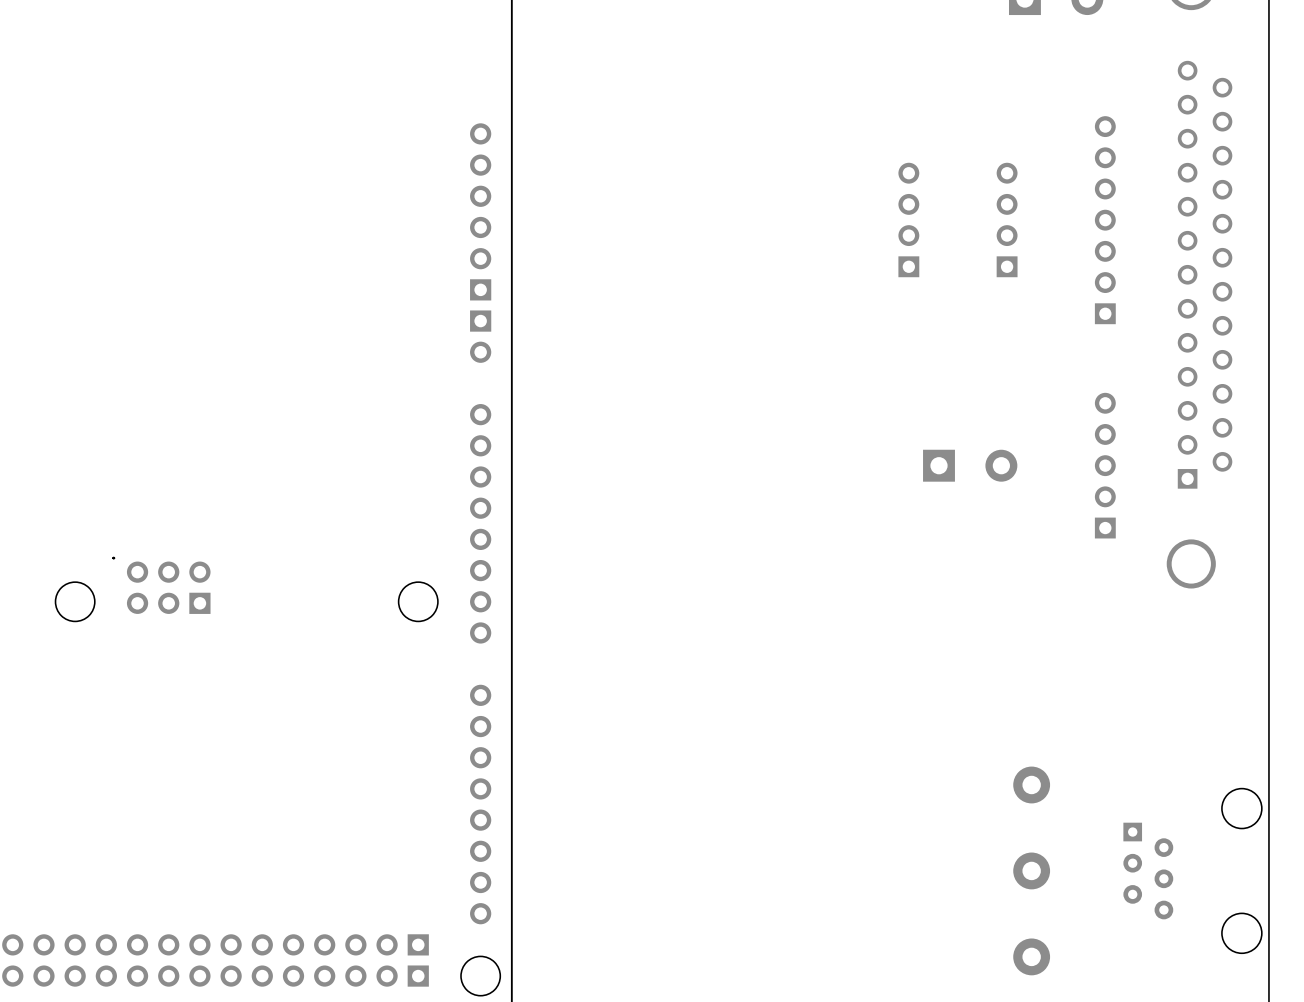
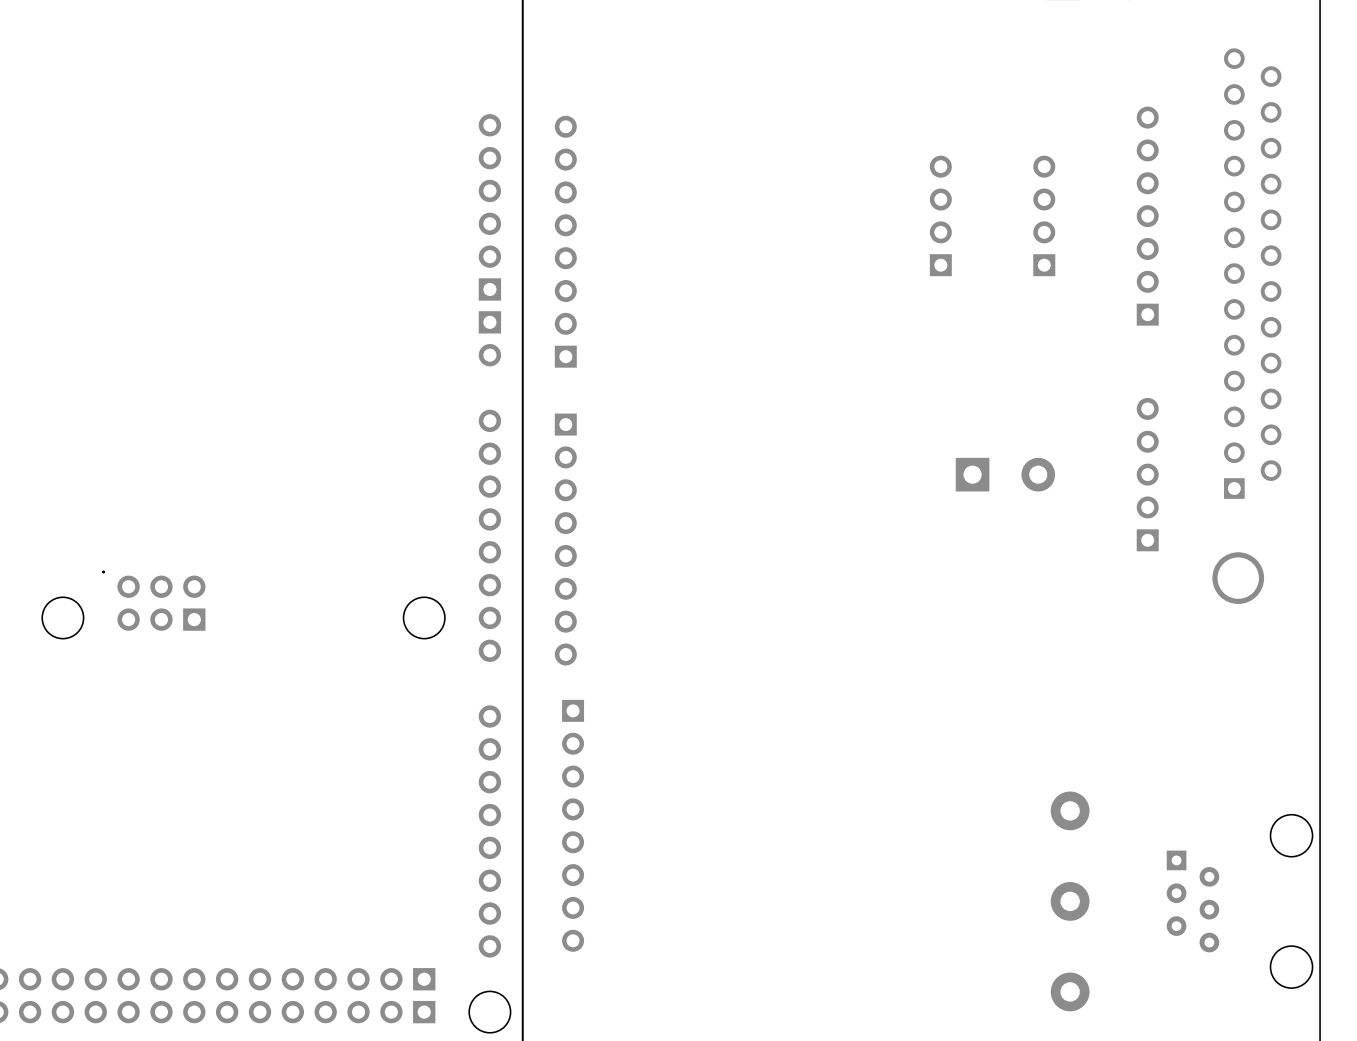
part: none -> (565, 241)
part: none -> (565, 539)
part: none -> (573, 825)

